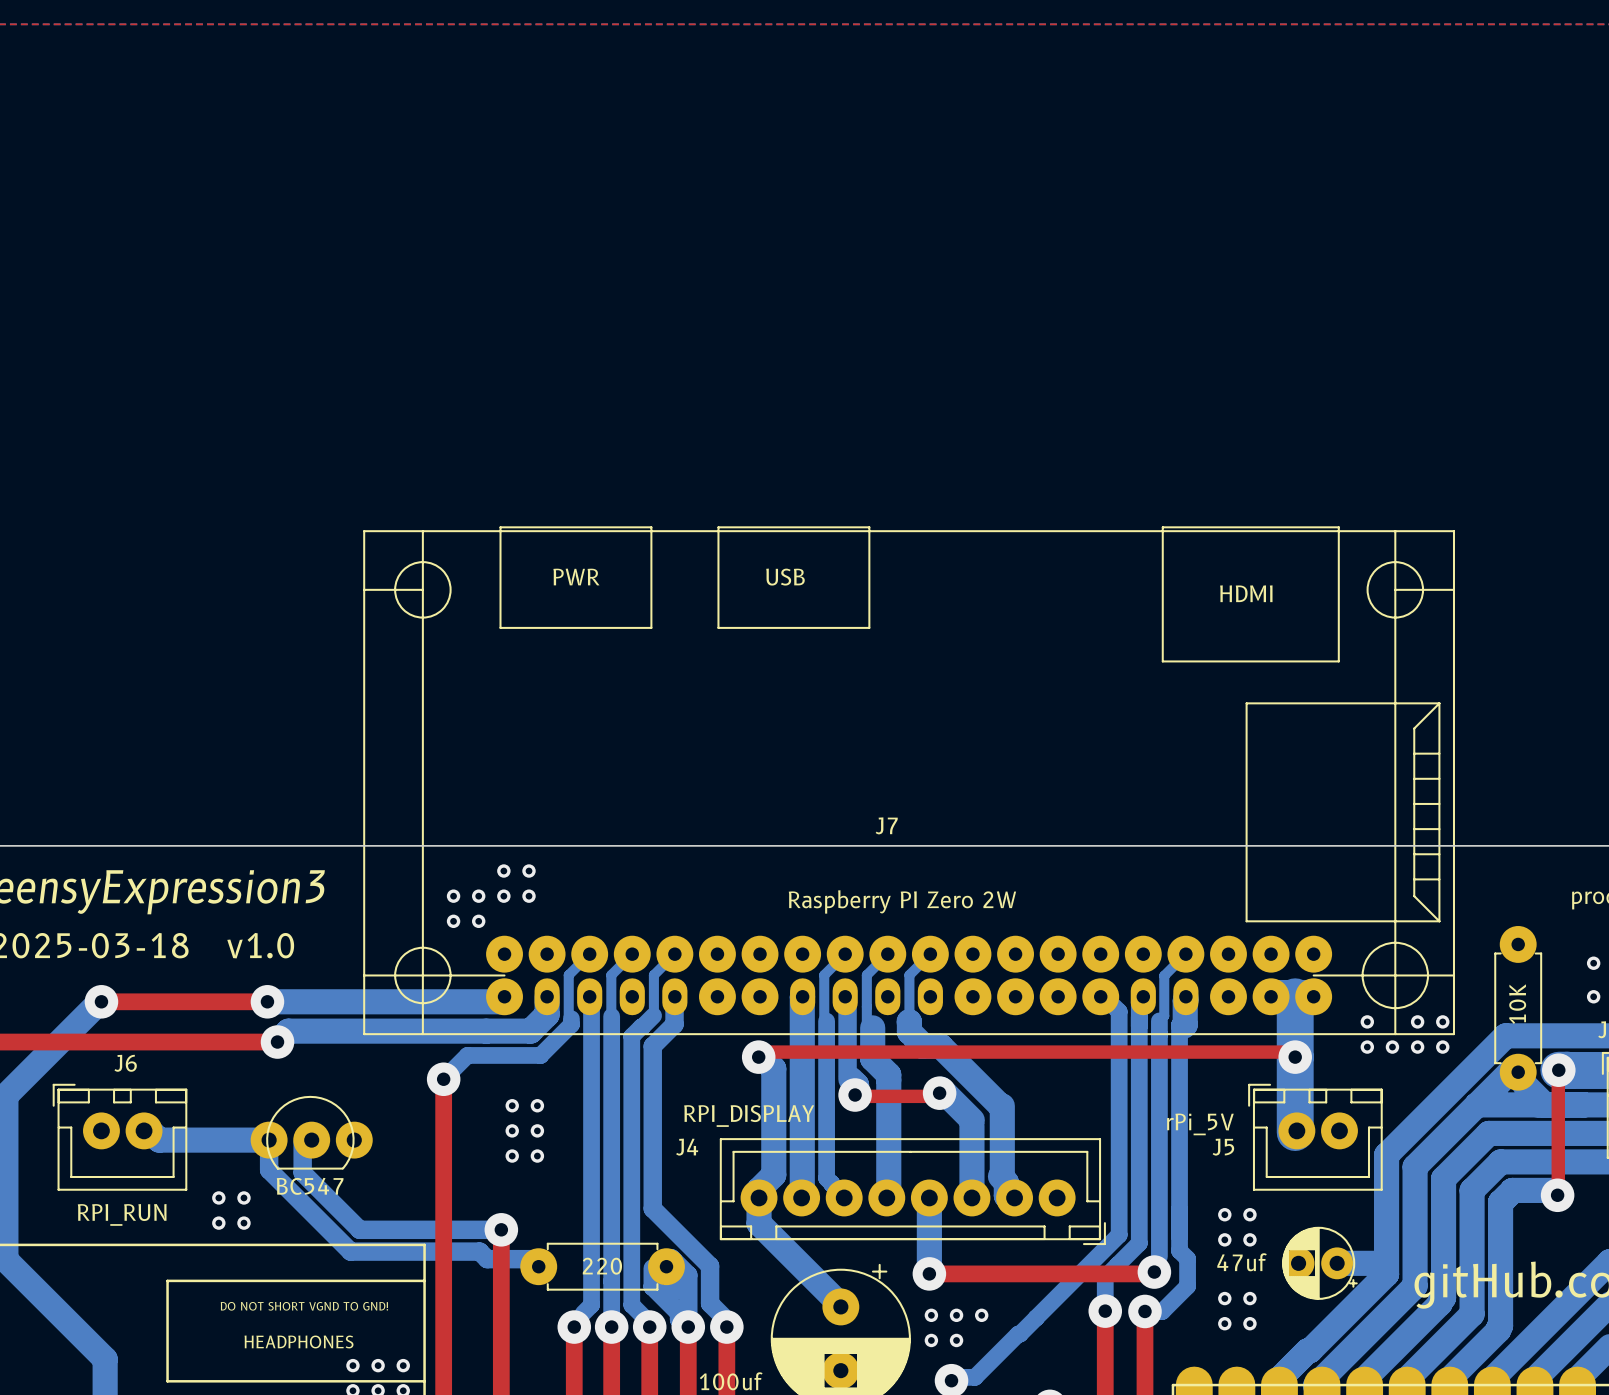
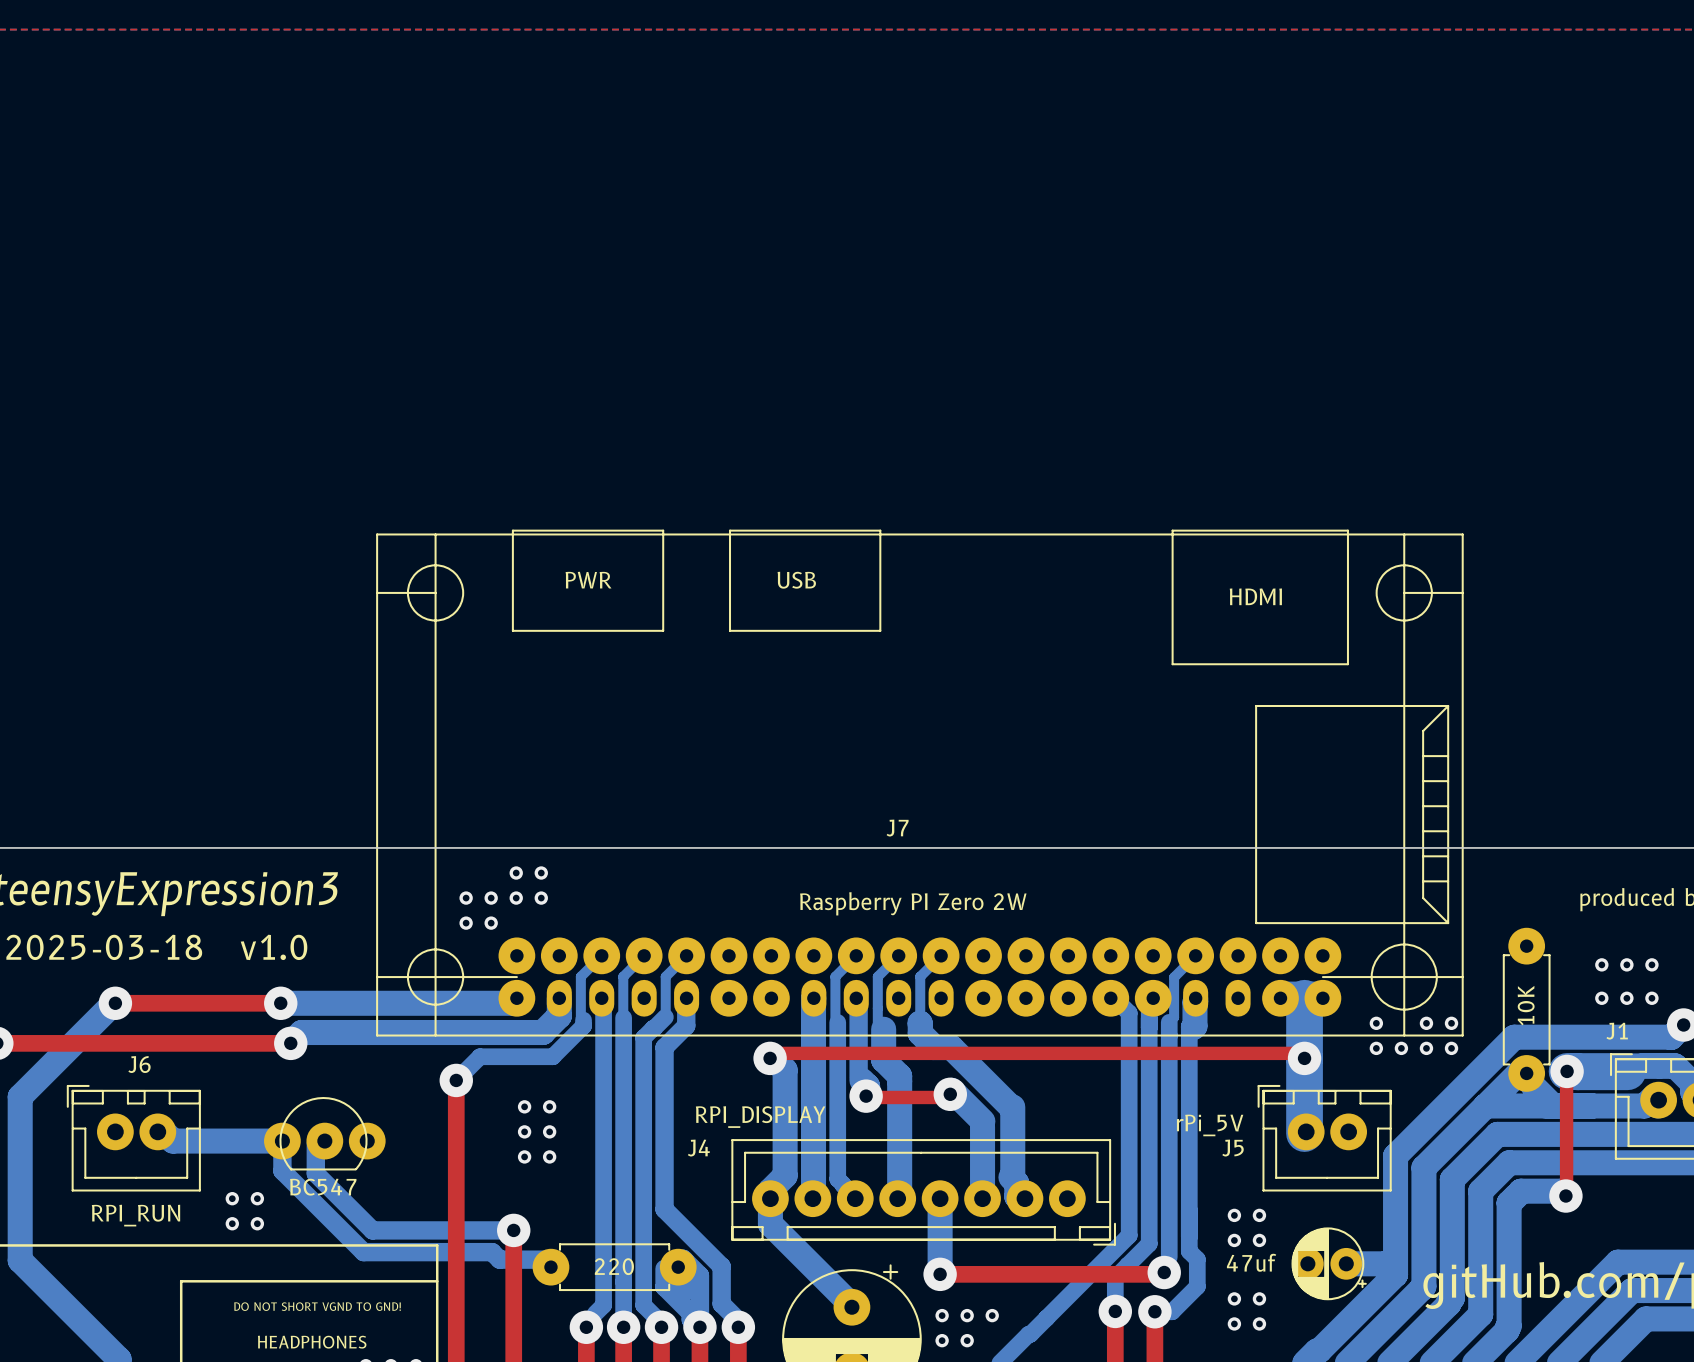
J7 footprint: [363, 526, 1456, 1036] -> [376, 529, 1464, 1037]

